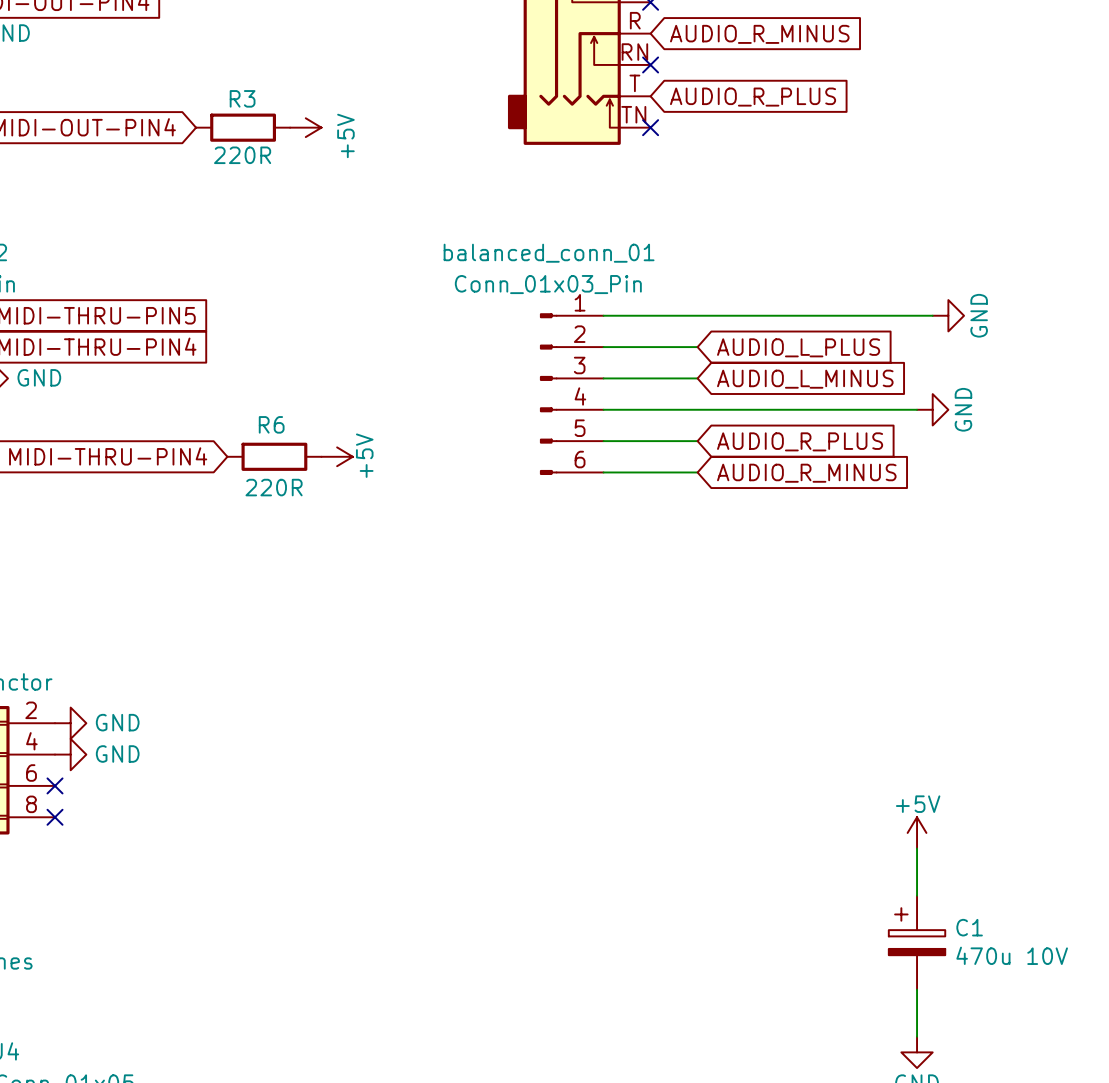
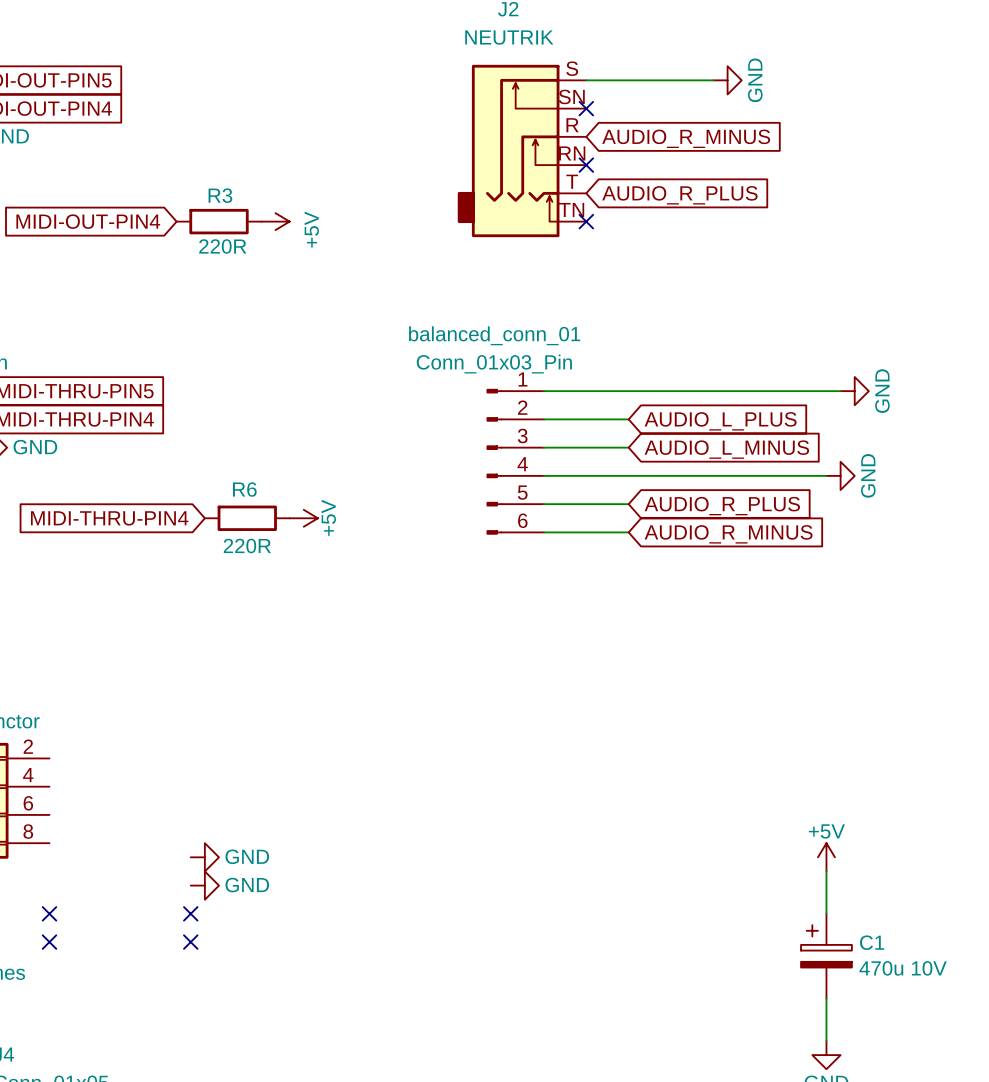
power symbol: GND (70, 723) -> none
power symbol: GND (70, 754) -> none
no-connect mark: (55, 785) -> none
no-connect mark: (55, 817) -> none
power symbol: none -> GND (204, 857)
power symbol: none -> GND (204, 885)
no-connect mark: none -> (49, 913)
no-connect mark: none -> (190, 913)
no-connect mark: none -> (49, 942)
no-connect mark: none -> (190, 942)

